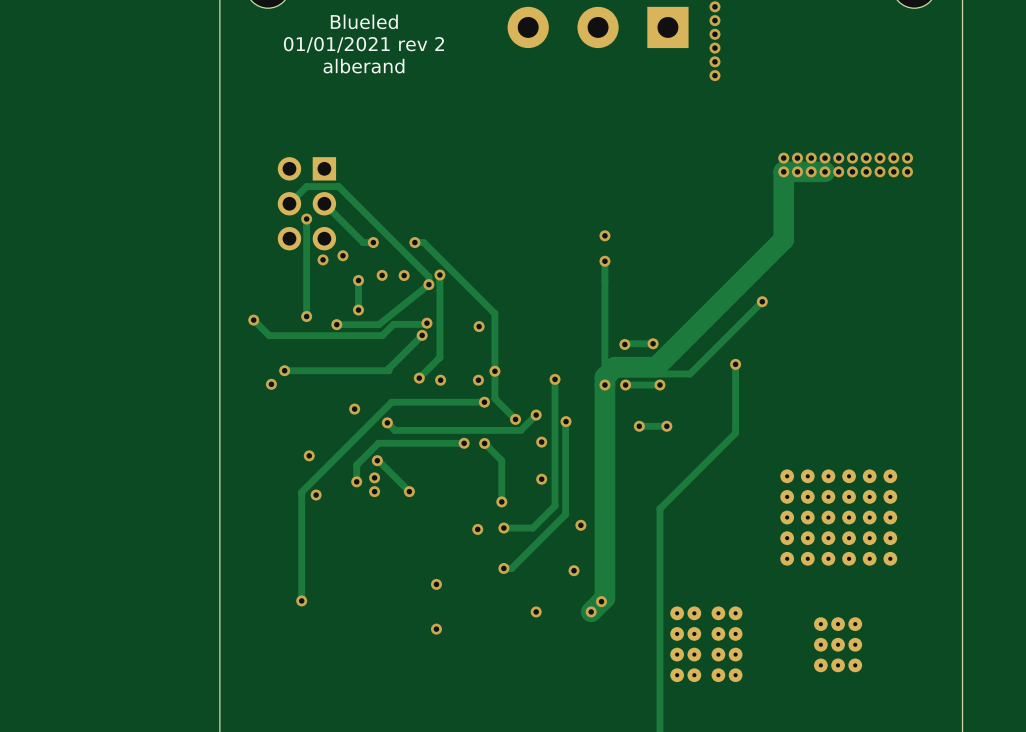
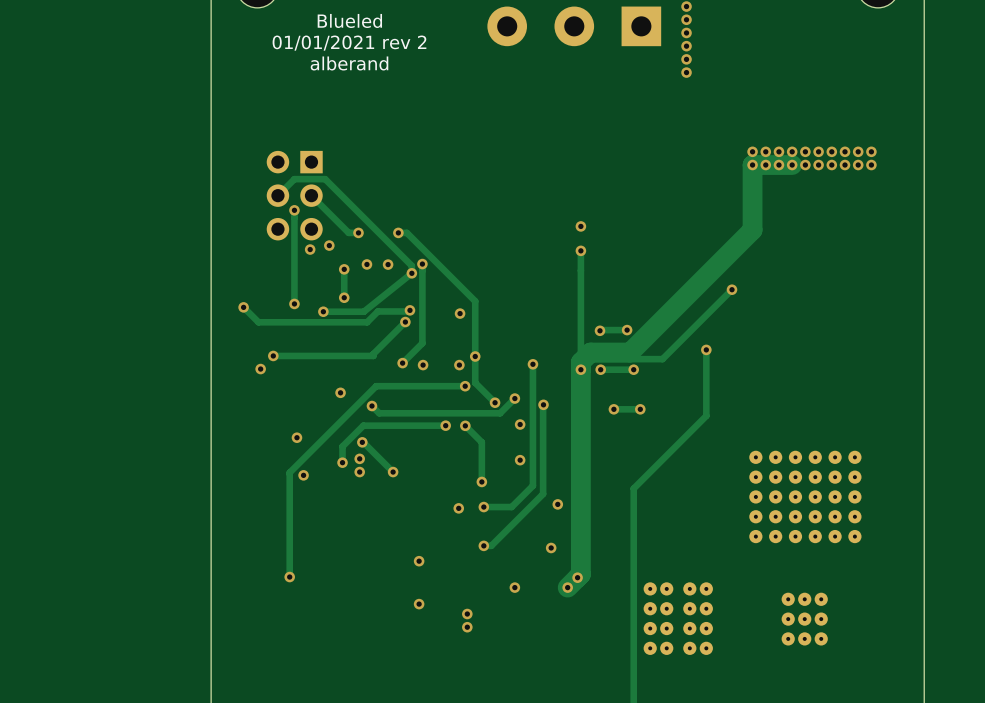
via: none -> (467, 614)
via: none -> (467, 627)

